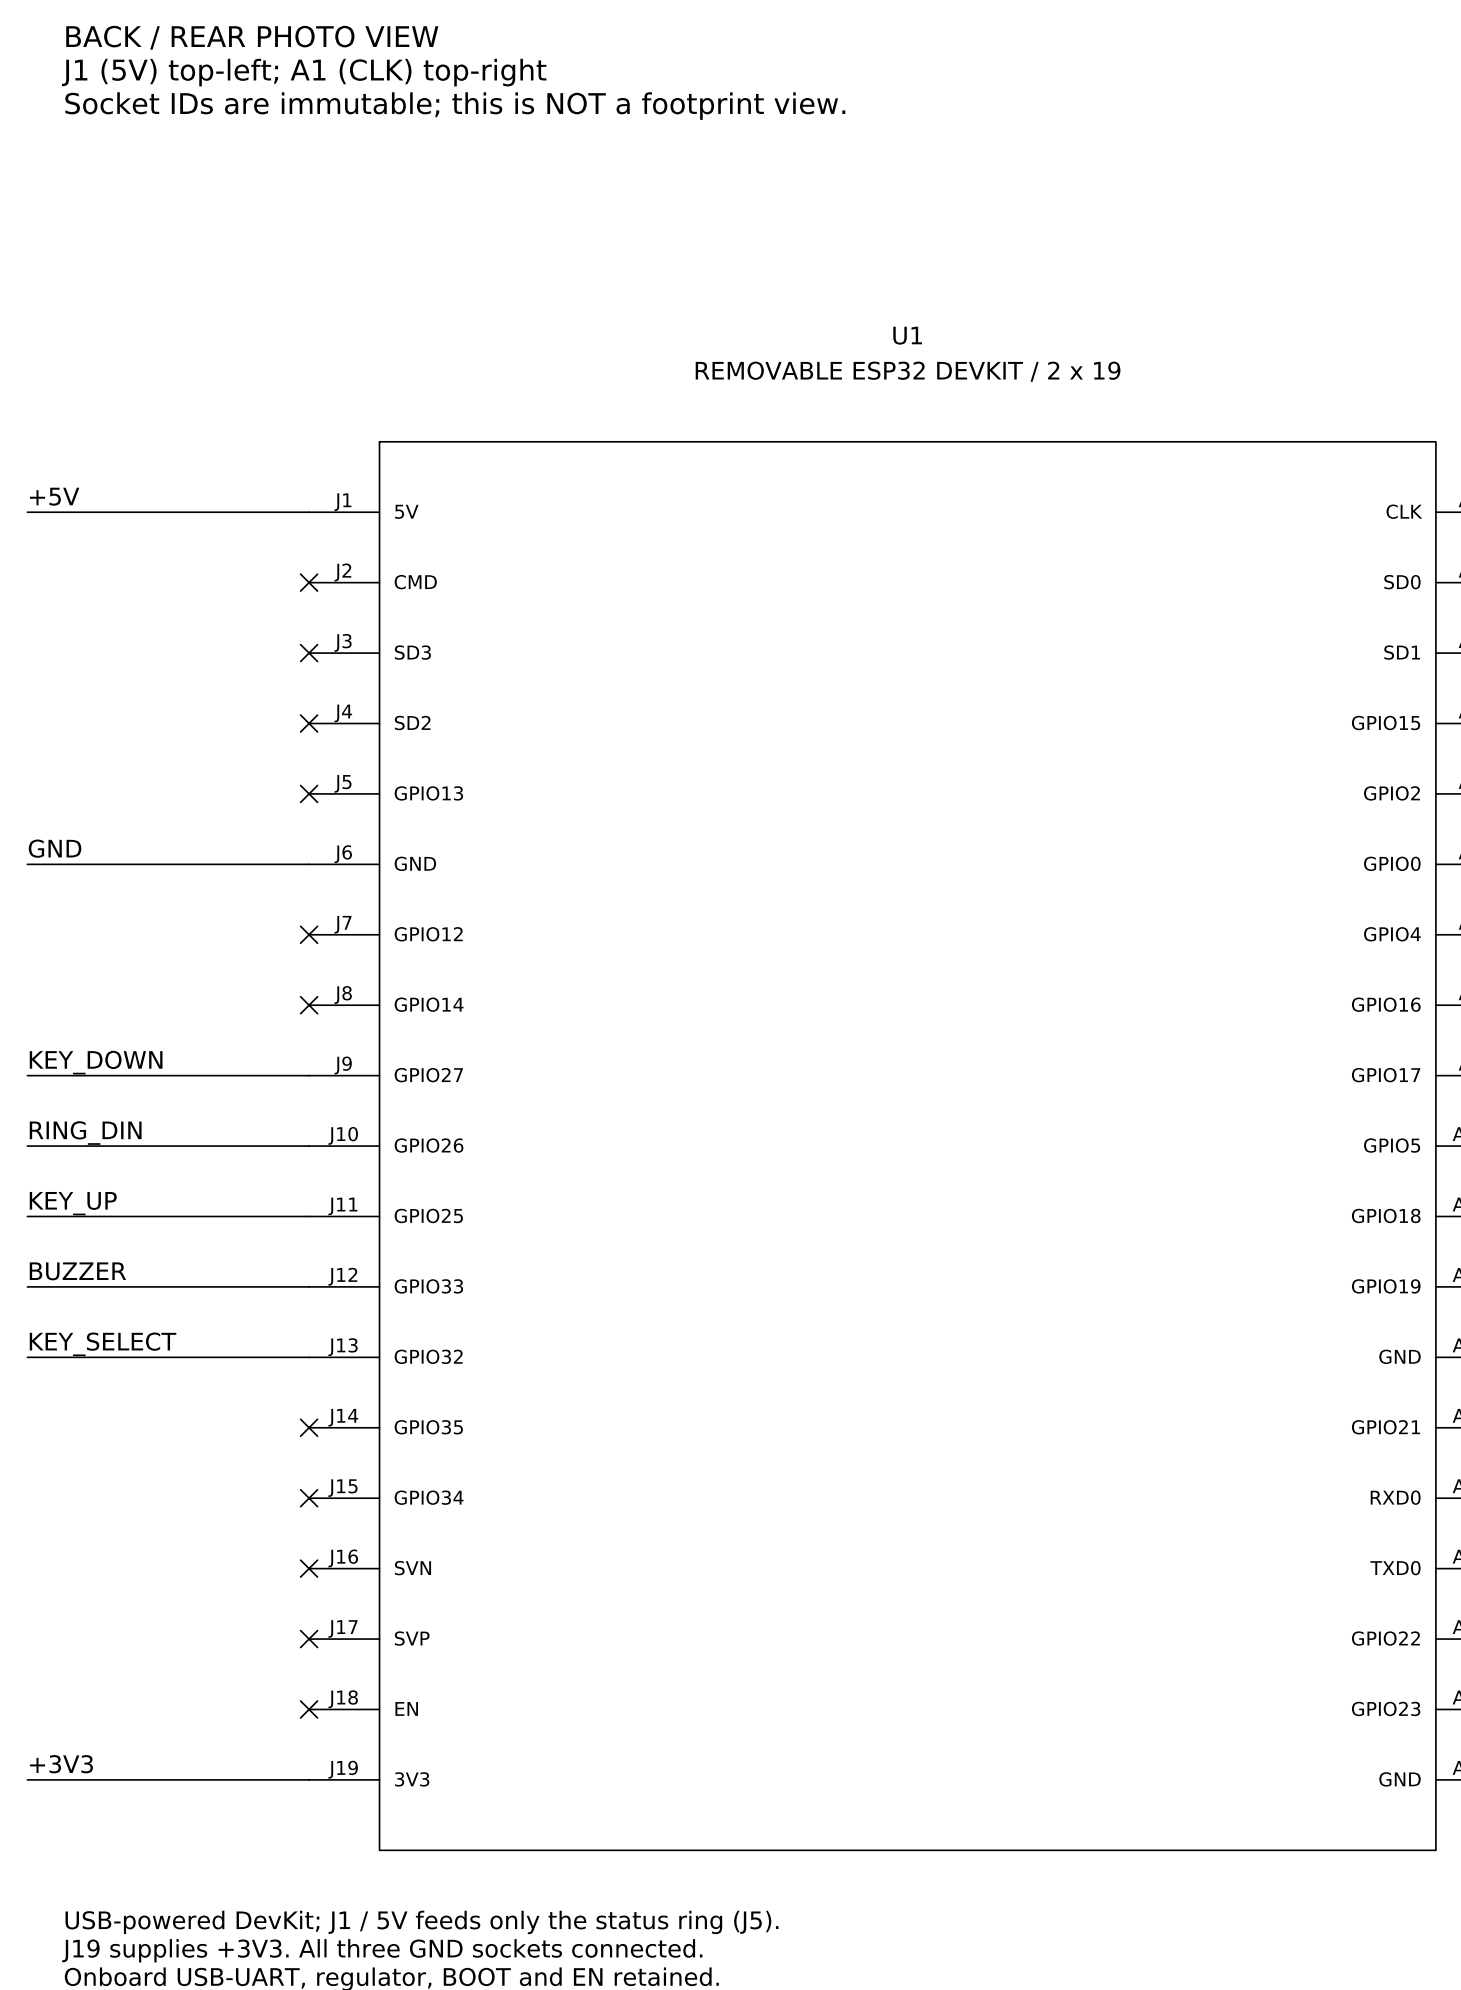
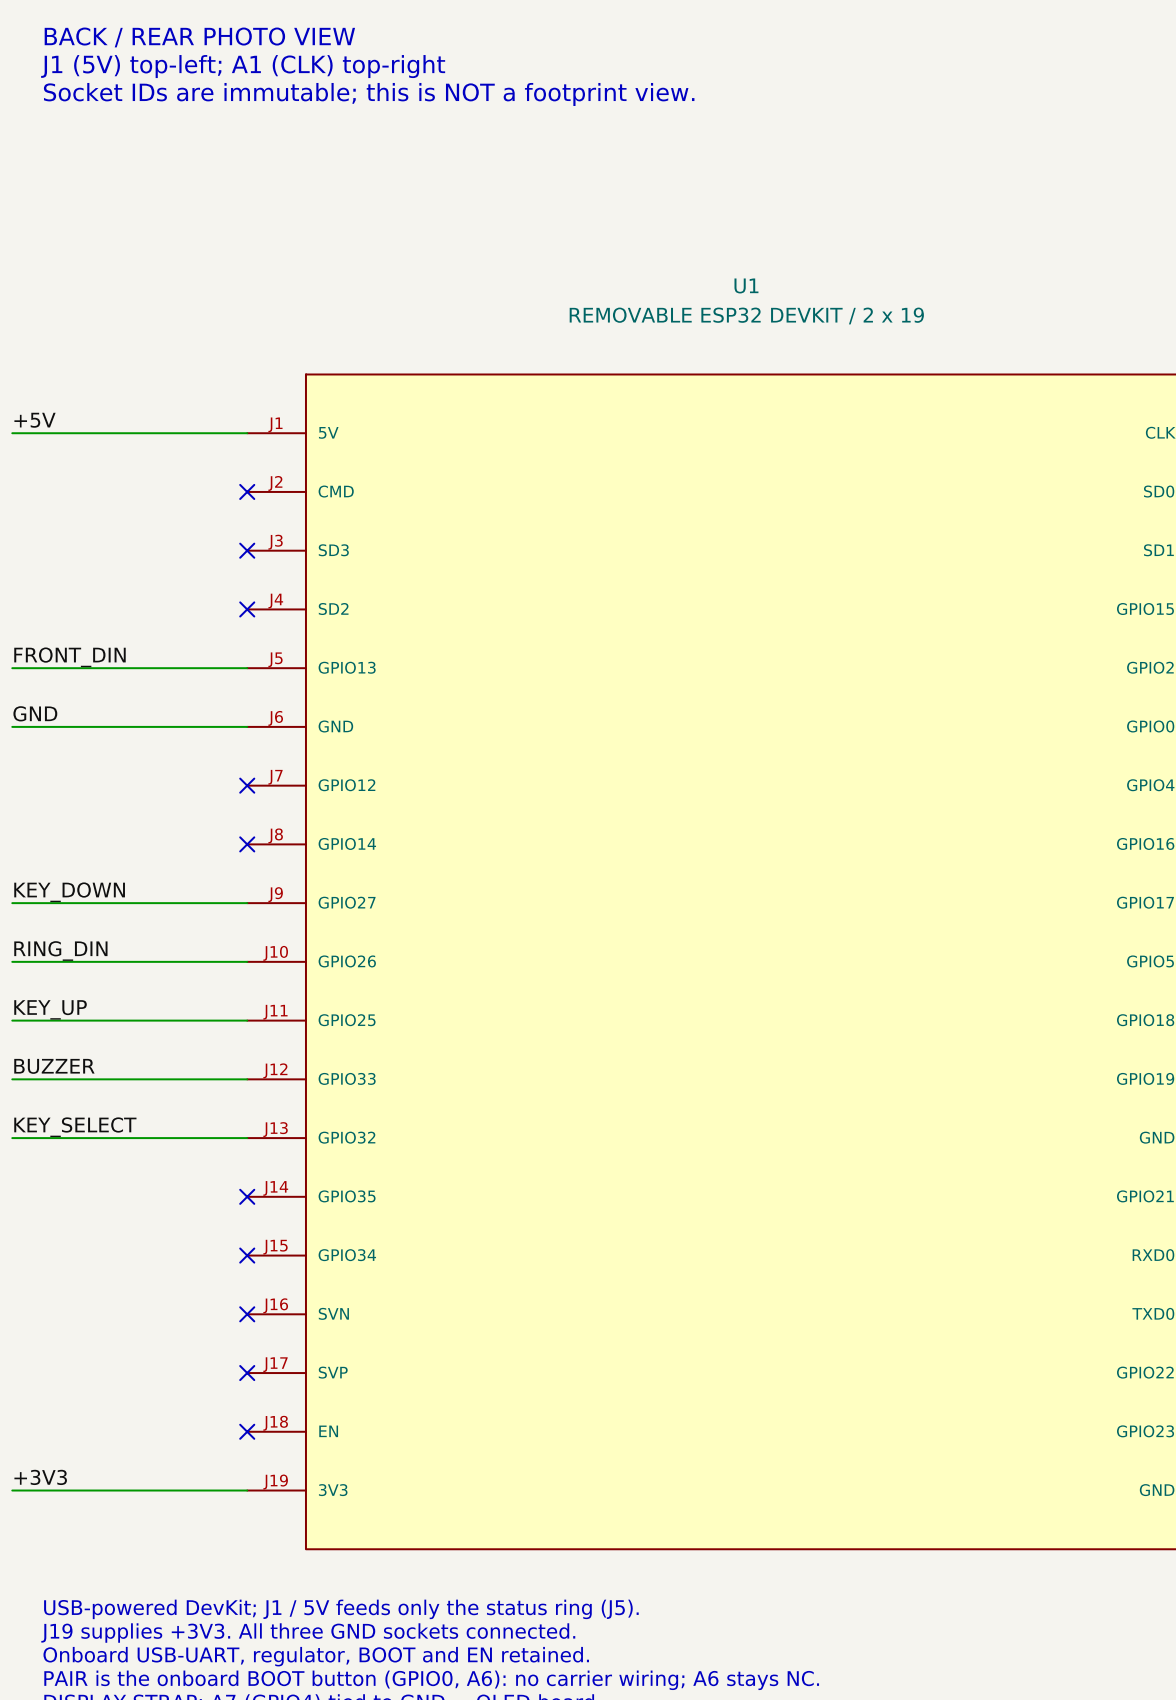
label: none -> FRONT_DIN (69, 657)
wire: none -> (12, 668) (247, 668)
no-connect mark: (309, 793) -> none

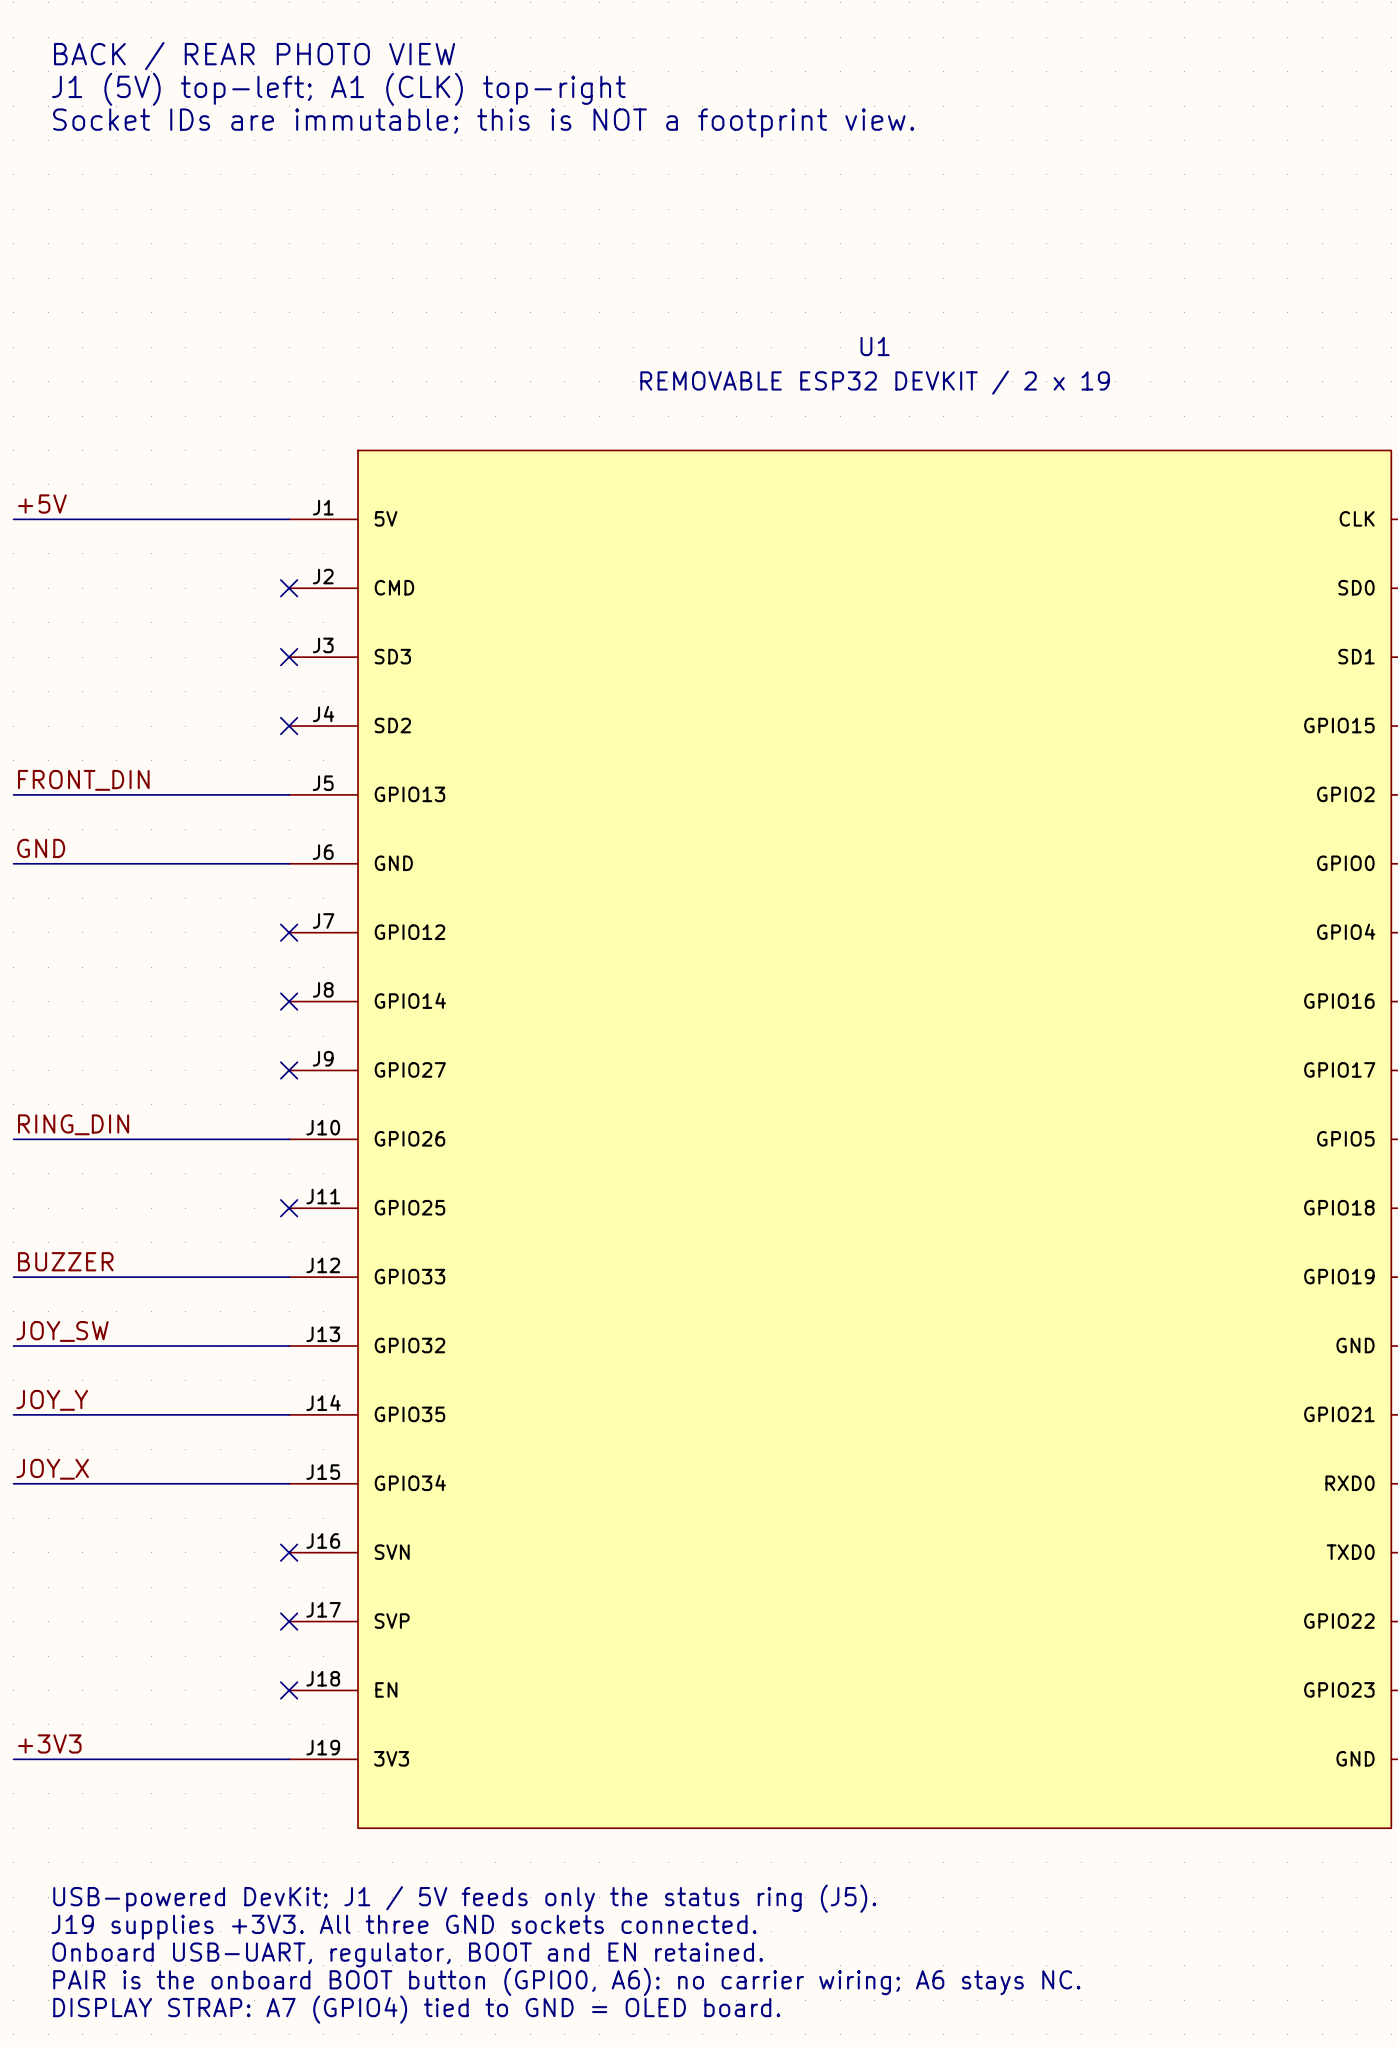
label: KEY_DOWN (69, 892) -> none
wire: (12, 903) (247, 903) -> none
no-connect mark: none -> (289, 1070)
label: KEY_UP (50, 1009) -> none
wire: (12, 1020) (247, 1020) -> (13, 1414) (289, 1414)
no-connect mark: none -> (289, 1208)
label: KEY_SELECT (75, 1127) -> JOY_SW (62, 1331)
label: none -> JOY_Y (52, 1400)
no-connect mark: (247, 1196) -> none
label: none -> JOY_X (52, 1469)
wire: none -> (13, 1483) (289, 1483)
no-connect mark: (247, 1255) -> none

